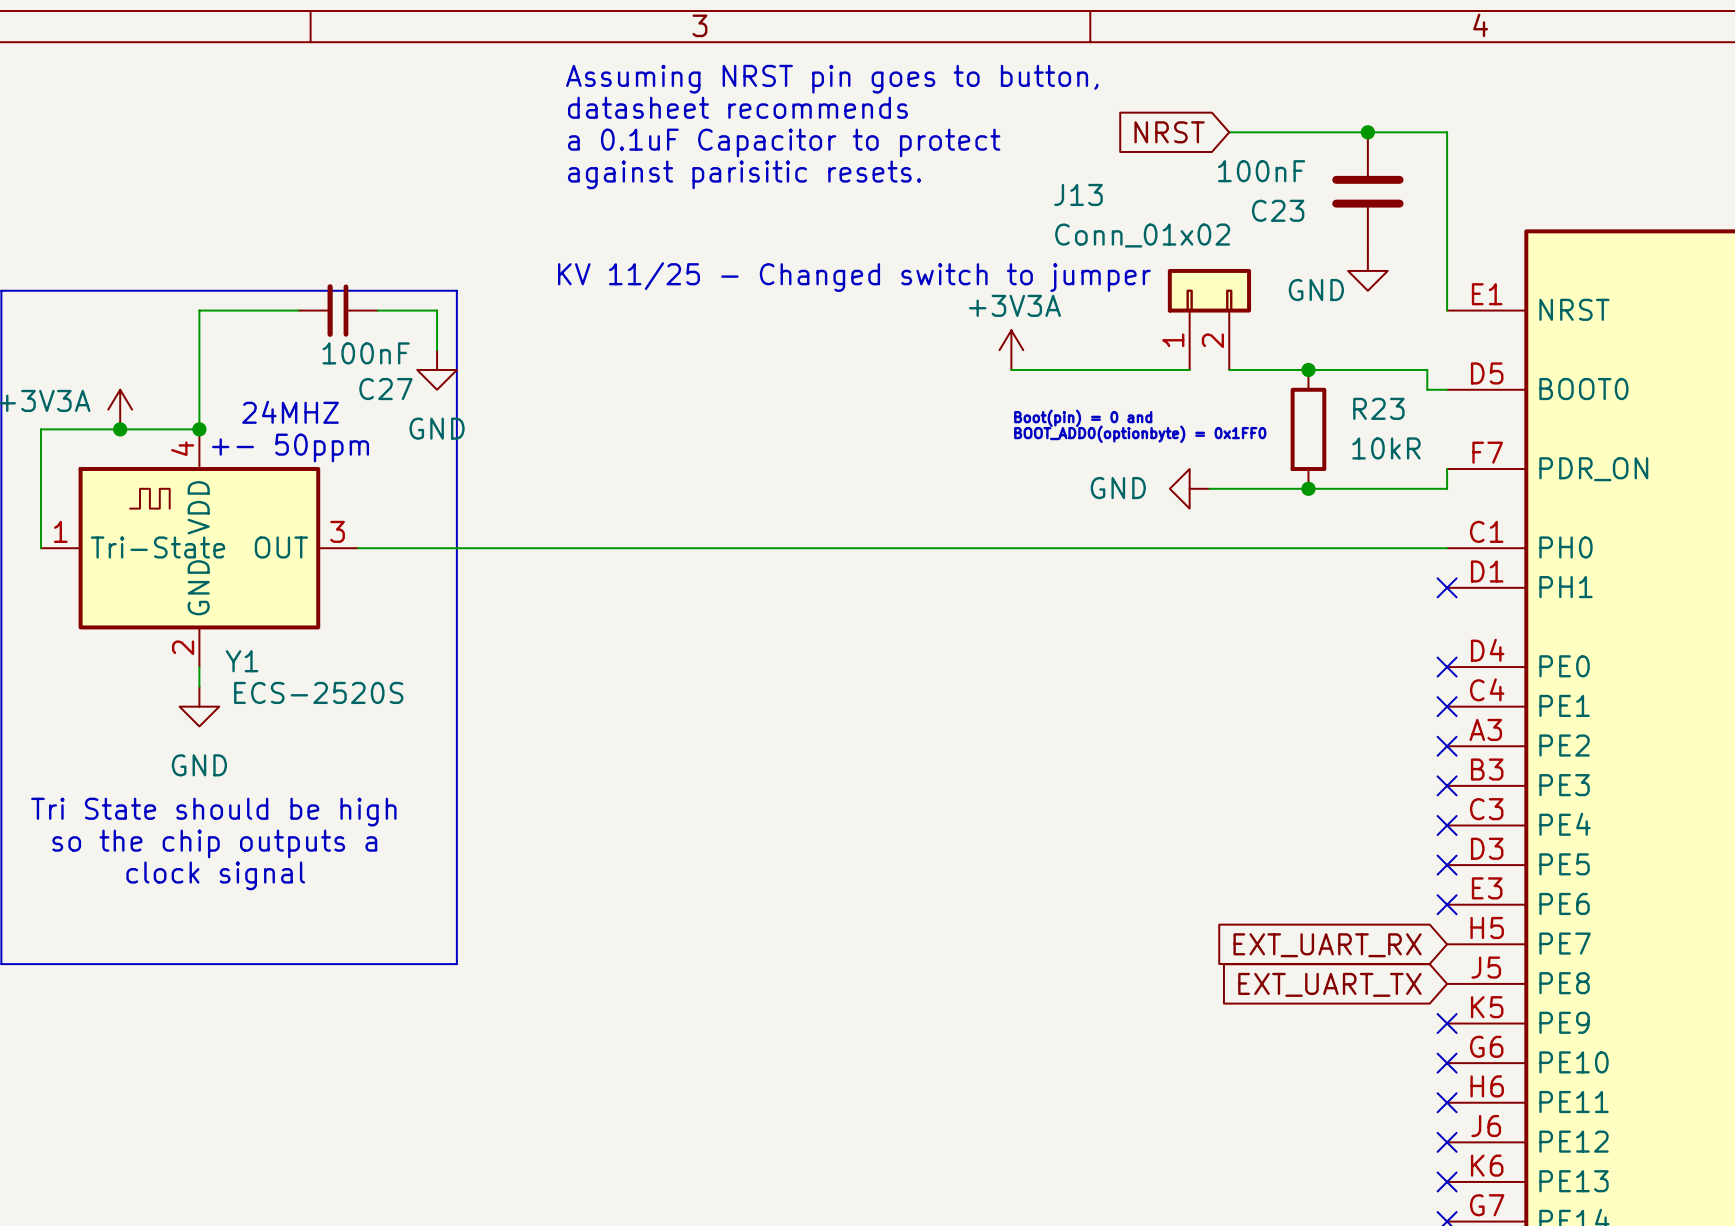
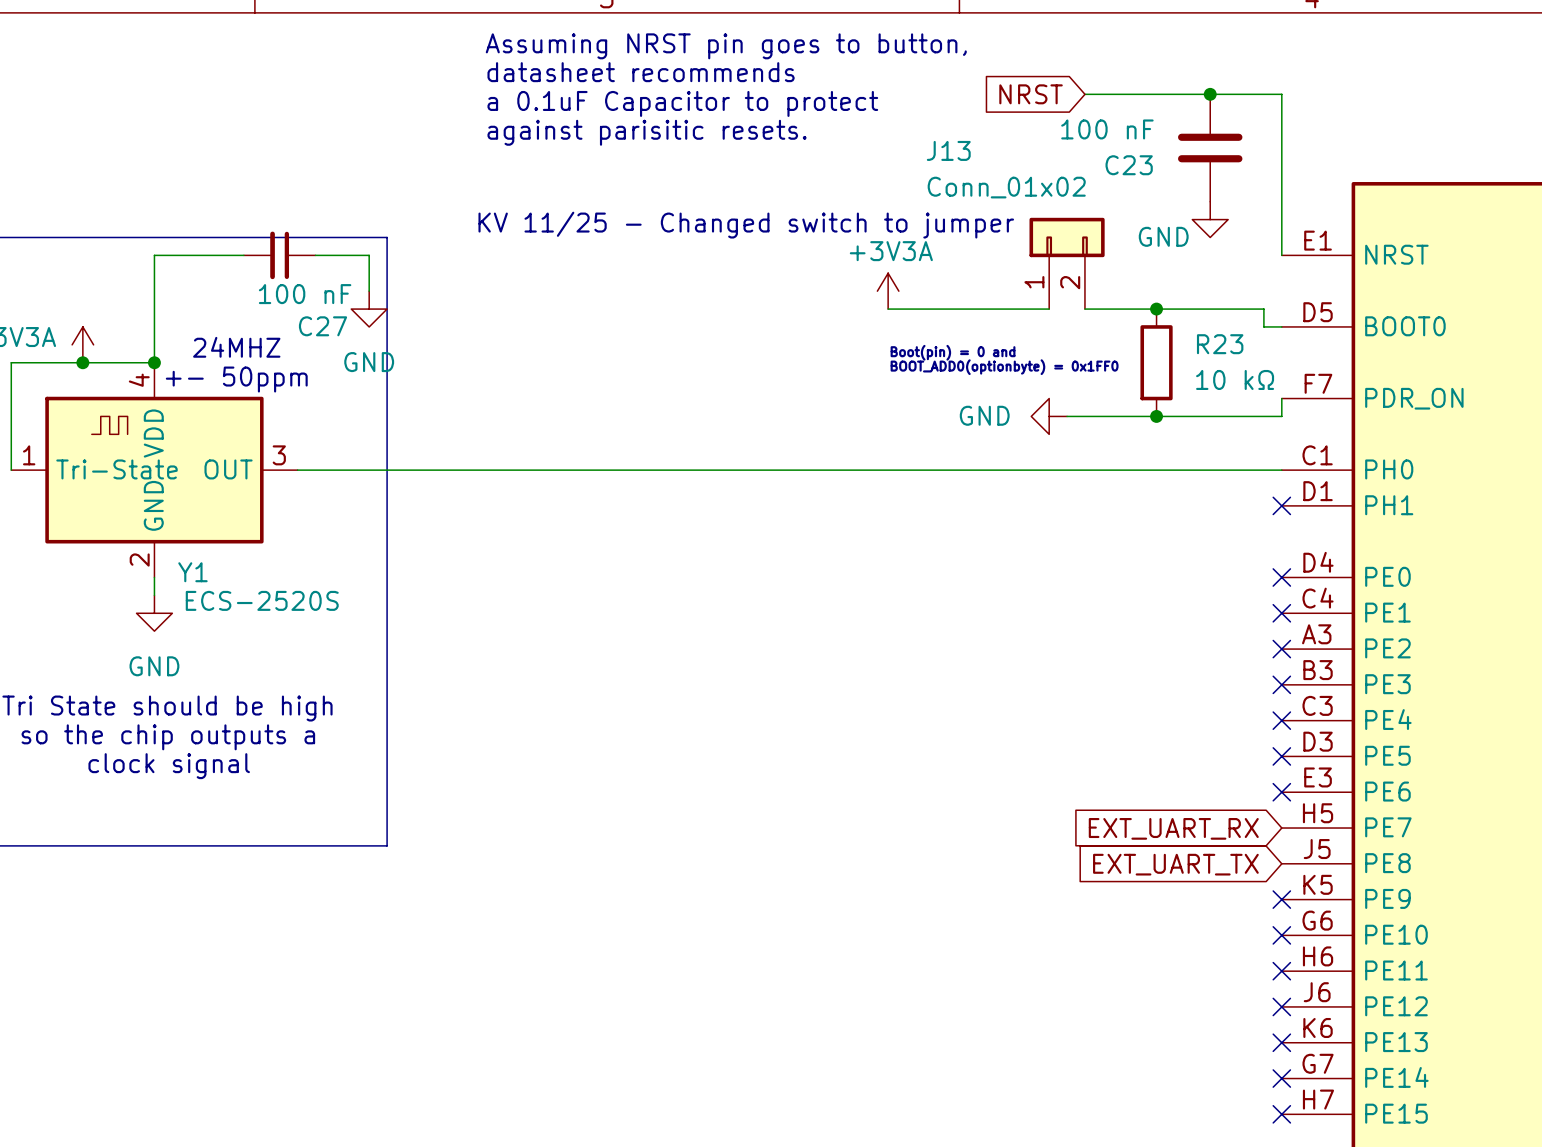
C23 value: 100nF (1261, 171) -> 100 nF (1107, 129)
C27 value: 100nF (366, 353) -> 100 nF (305, 294)
R23 value: 10kR (1386, 448) -> 10 kΩ (1235, 379)

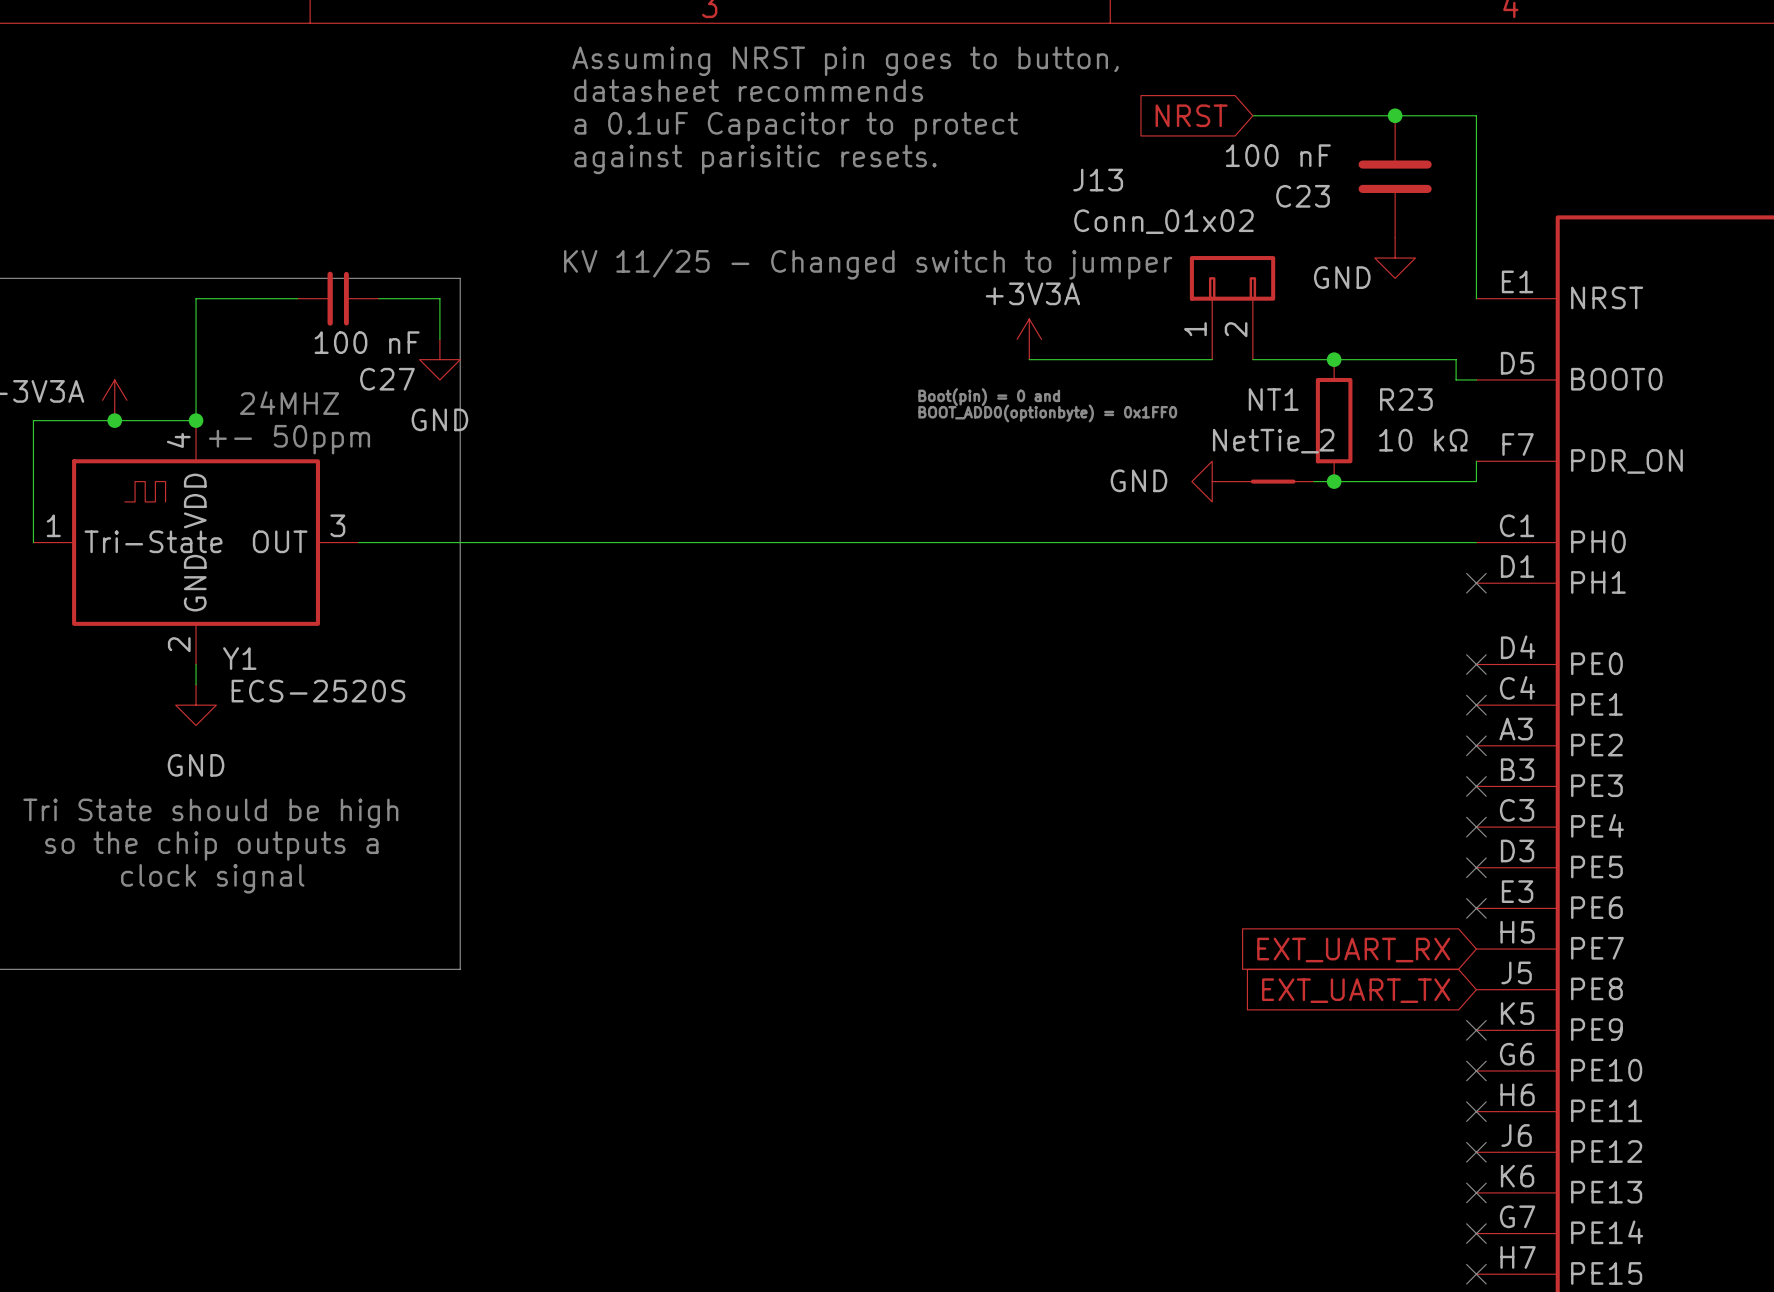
text position: Boot(pin) = 0 and (953, 352) -> Boot(pin) = 0 and (989, 397)
text position: BOOT_ADD0(optionbyte) = 0x1FF0 (1004, 367) -> BOOT_ADD0(optionbyte) = 0x1FF0 (1047, 413)
NT1: none -> NetTie_2 (1273, 481)

